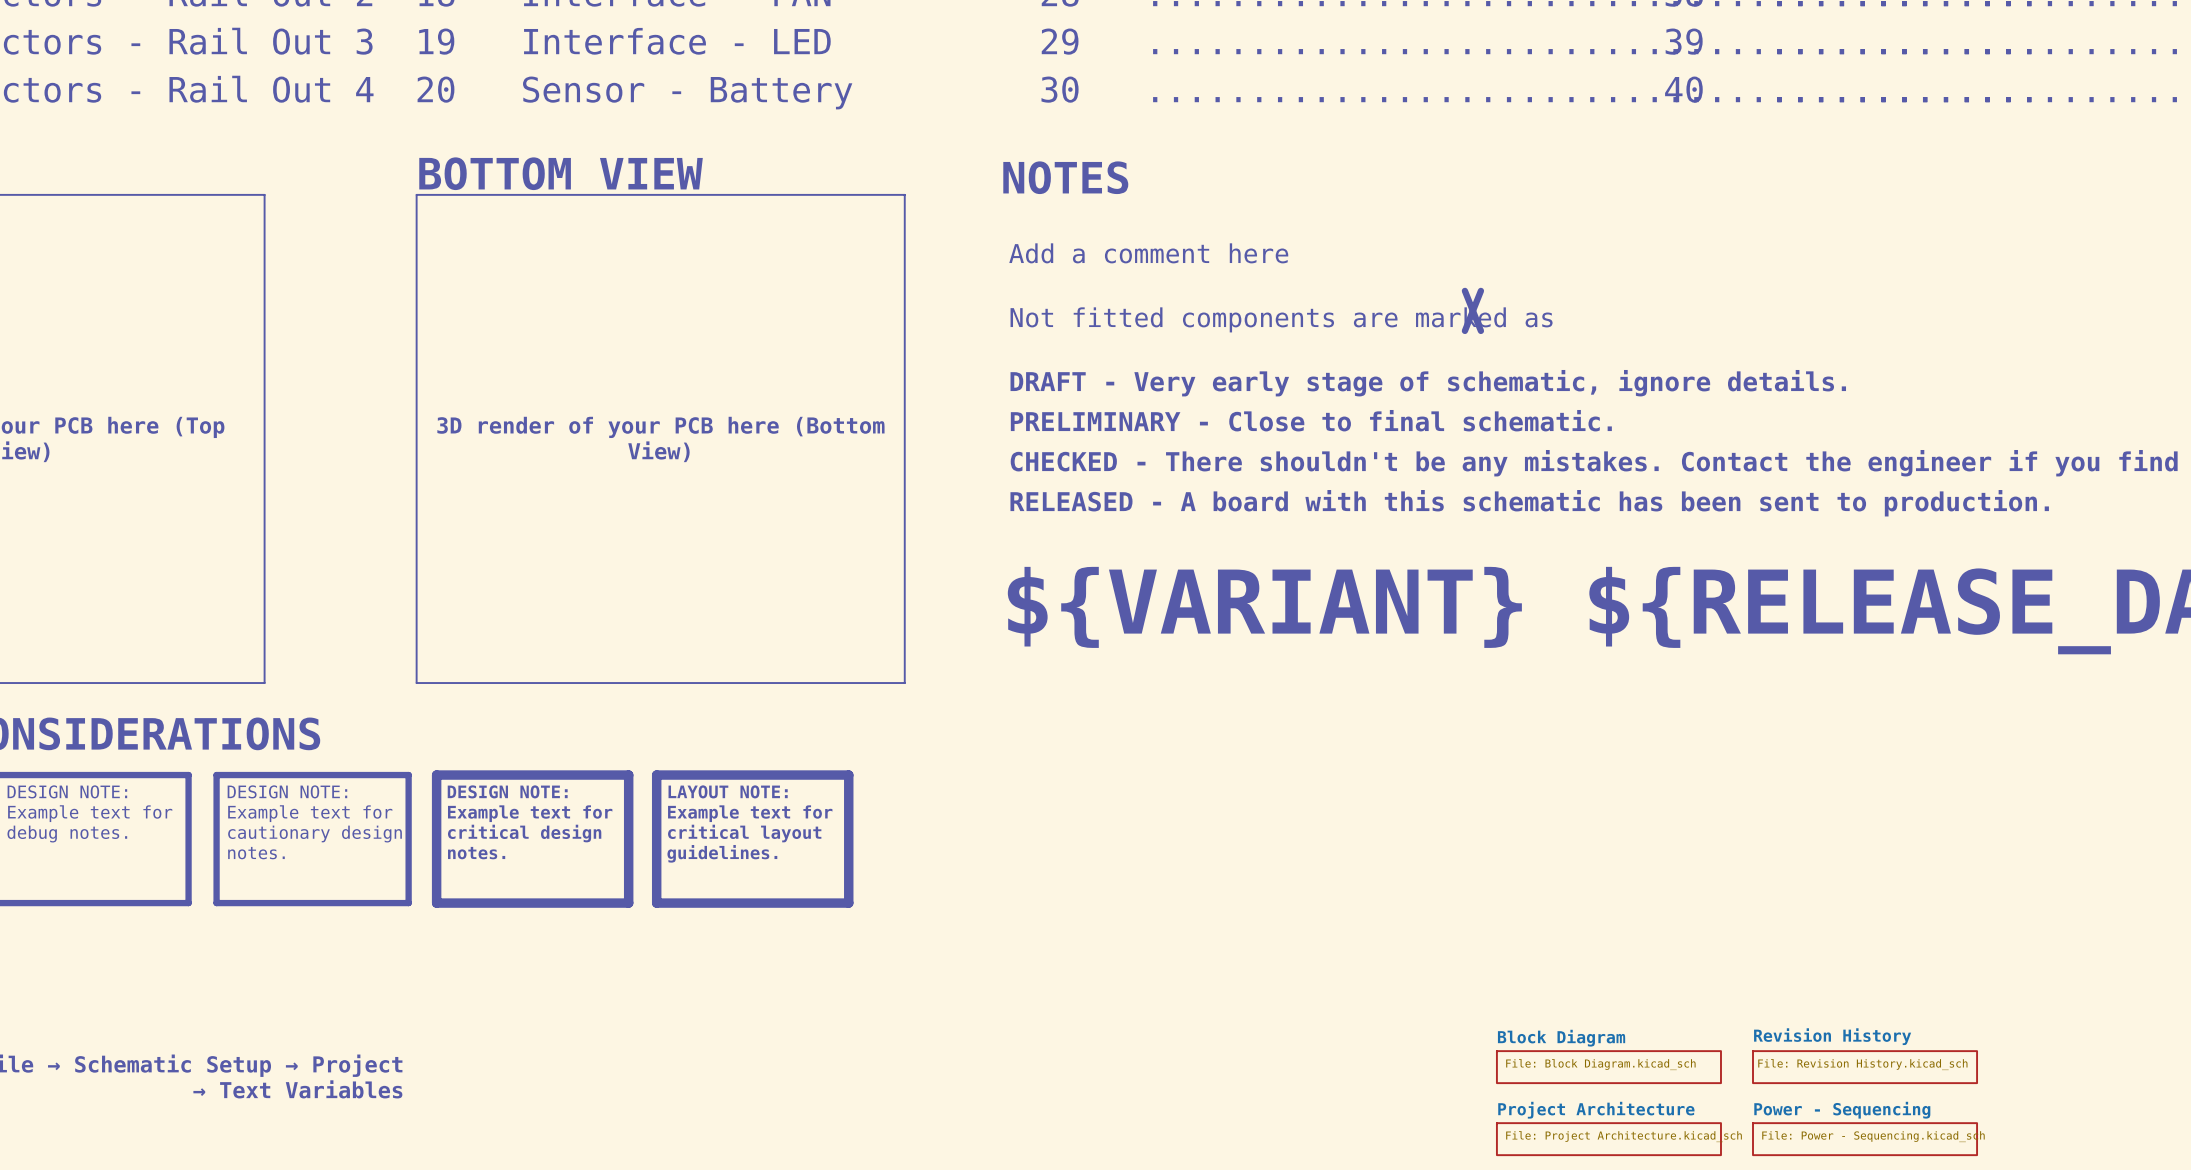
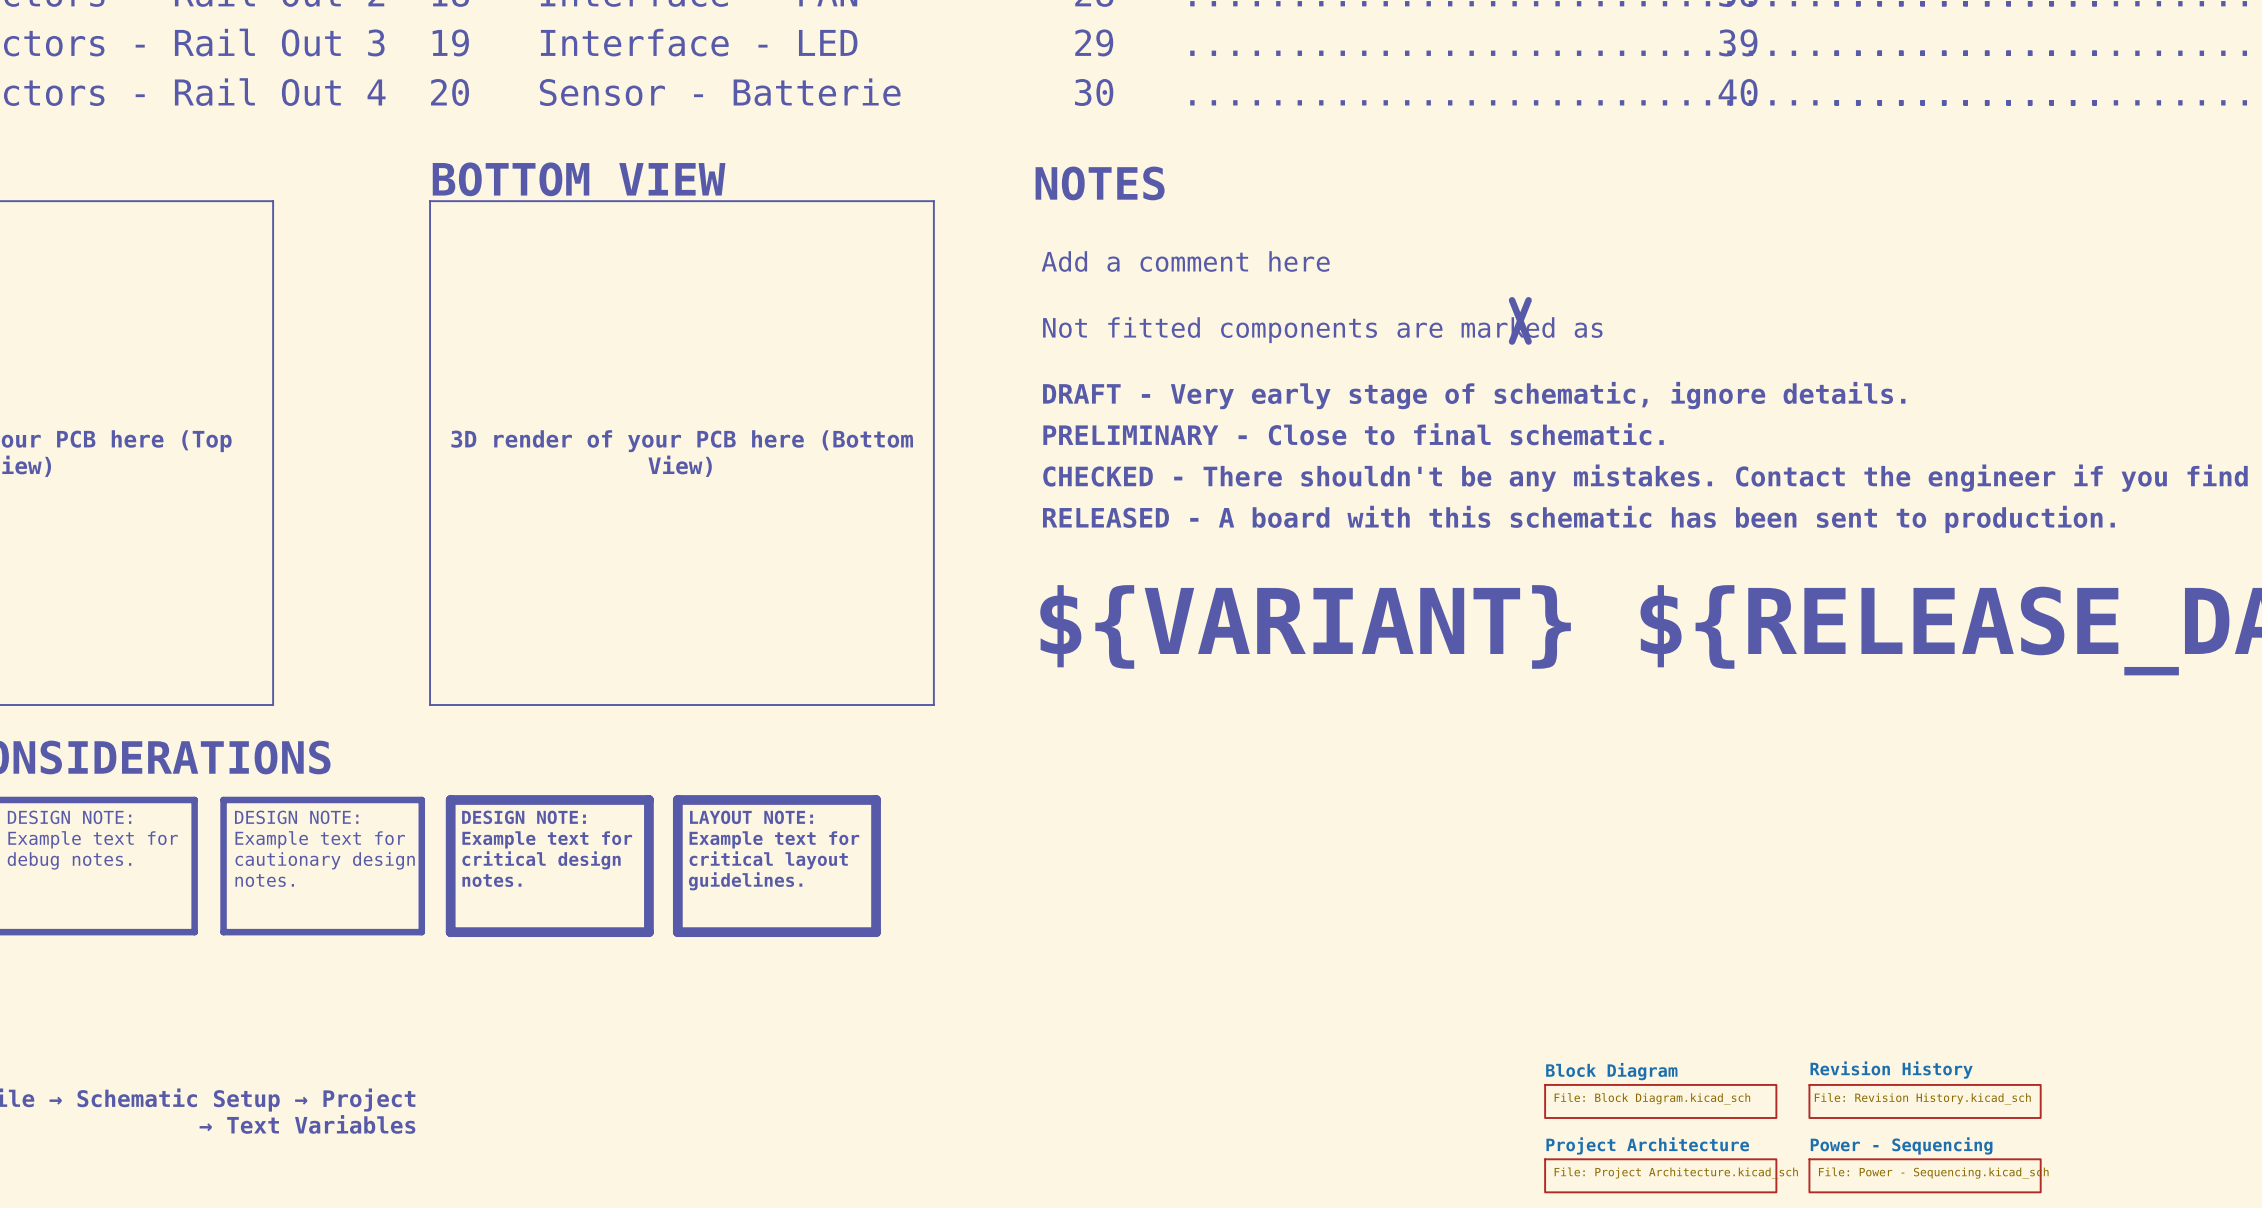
text: Sensor - Battery (687, 92) -> Sensor - Batterie (720, 92)

